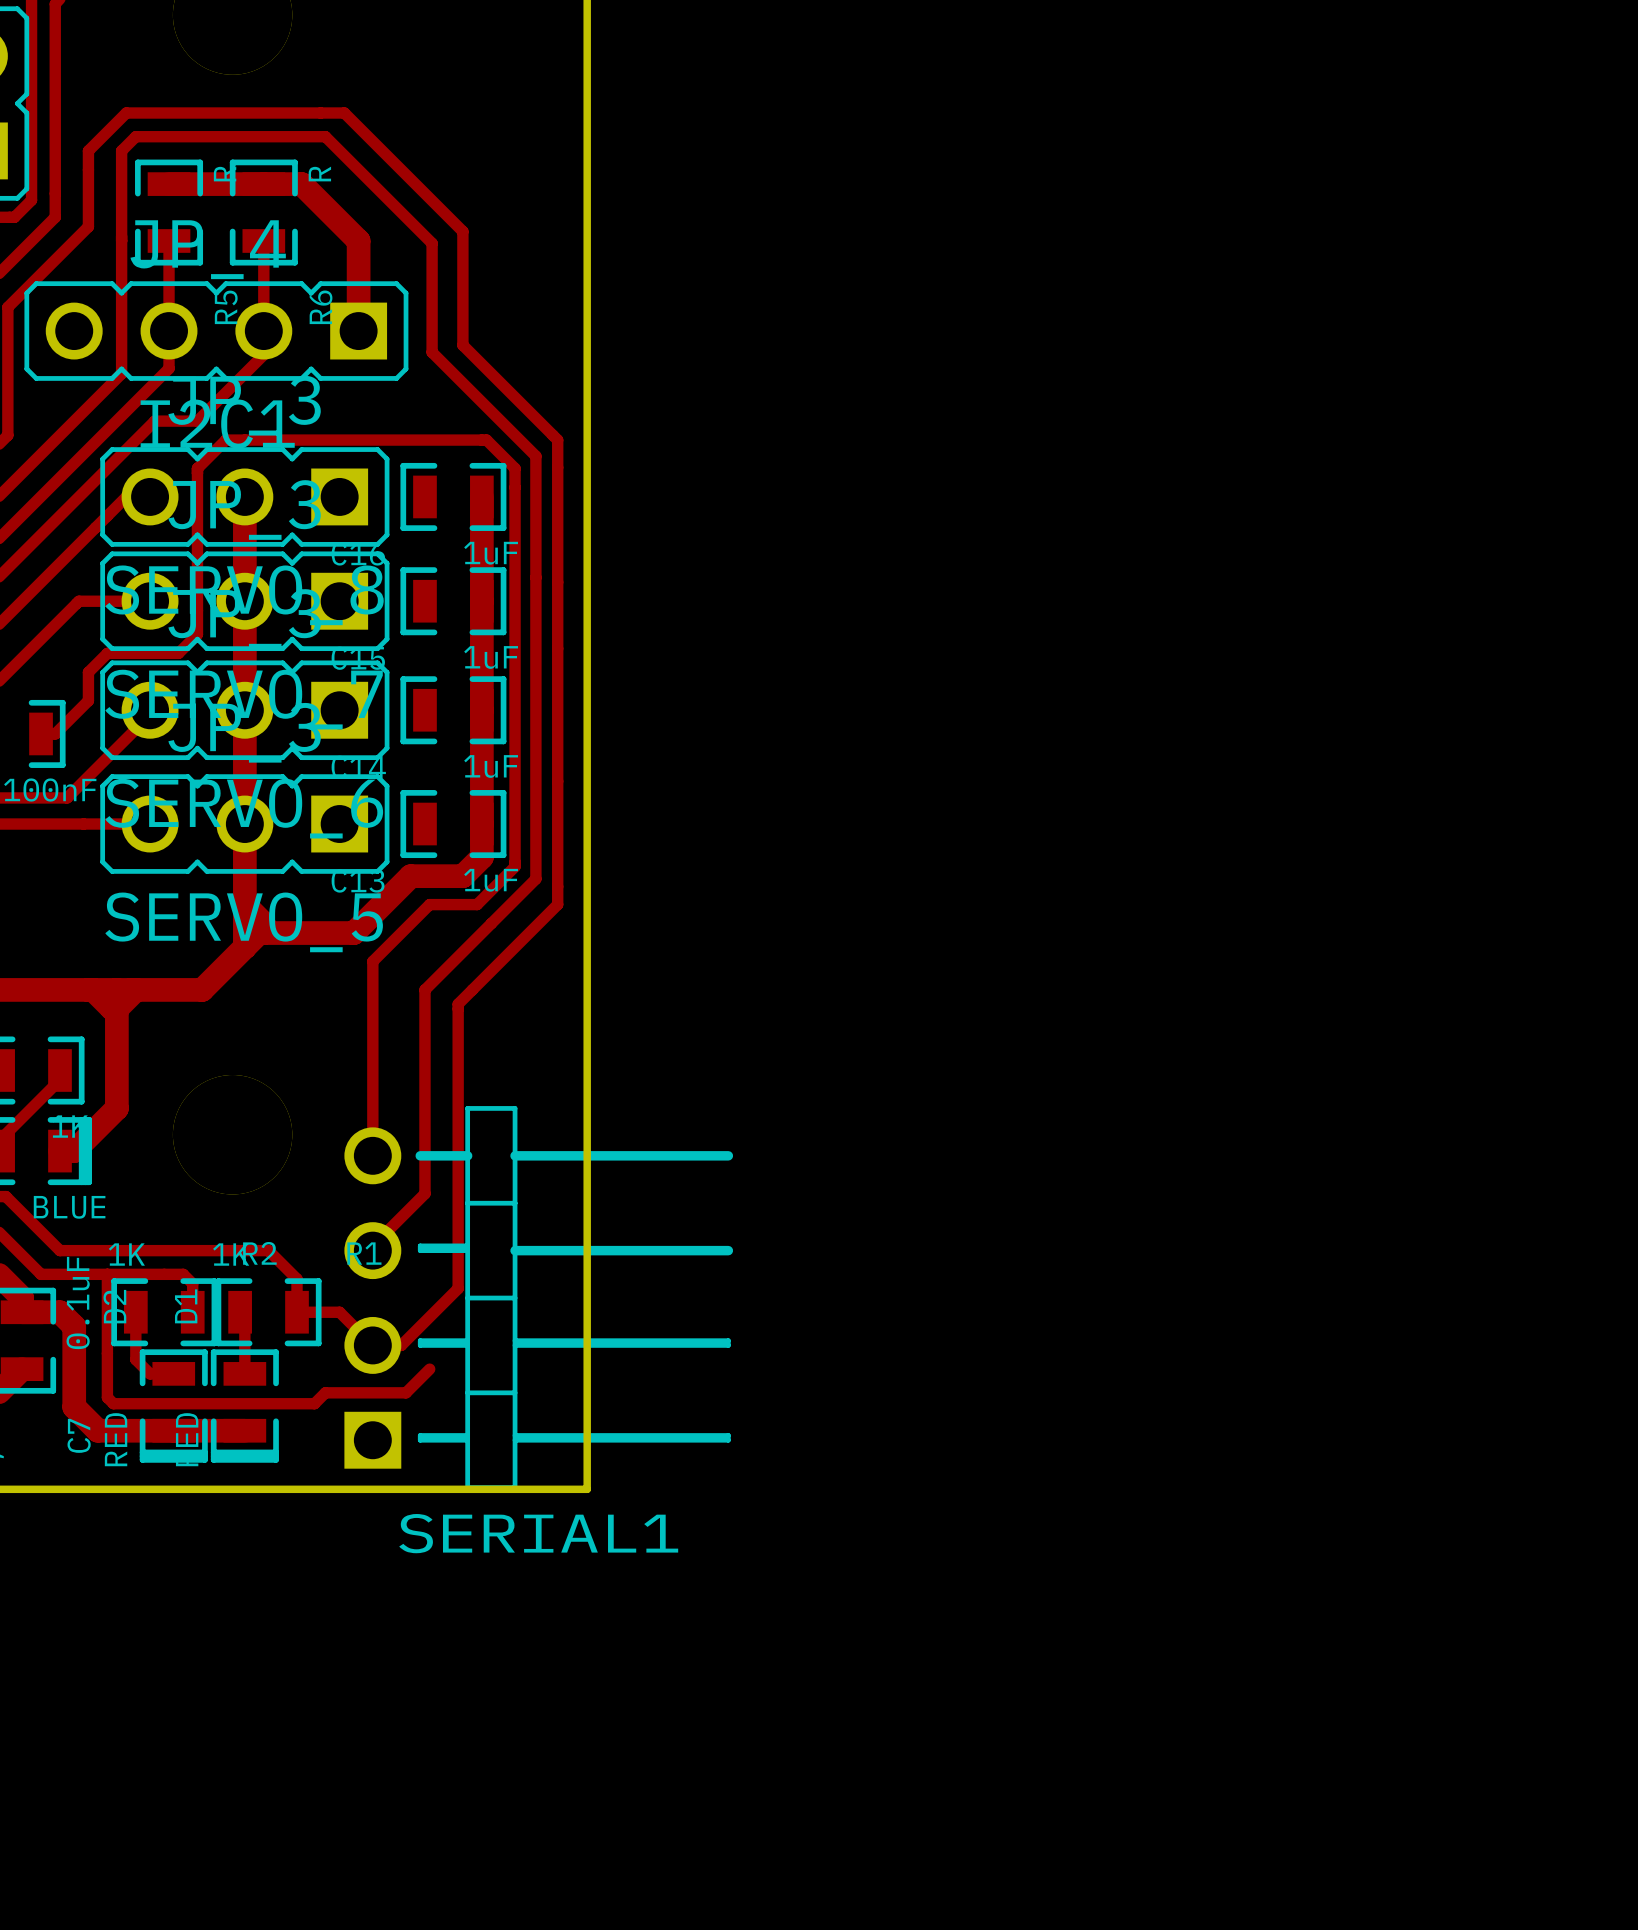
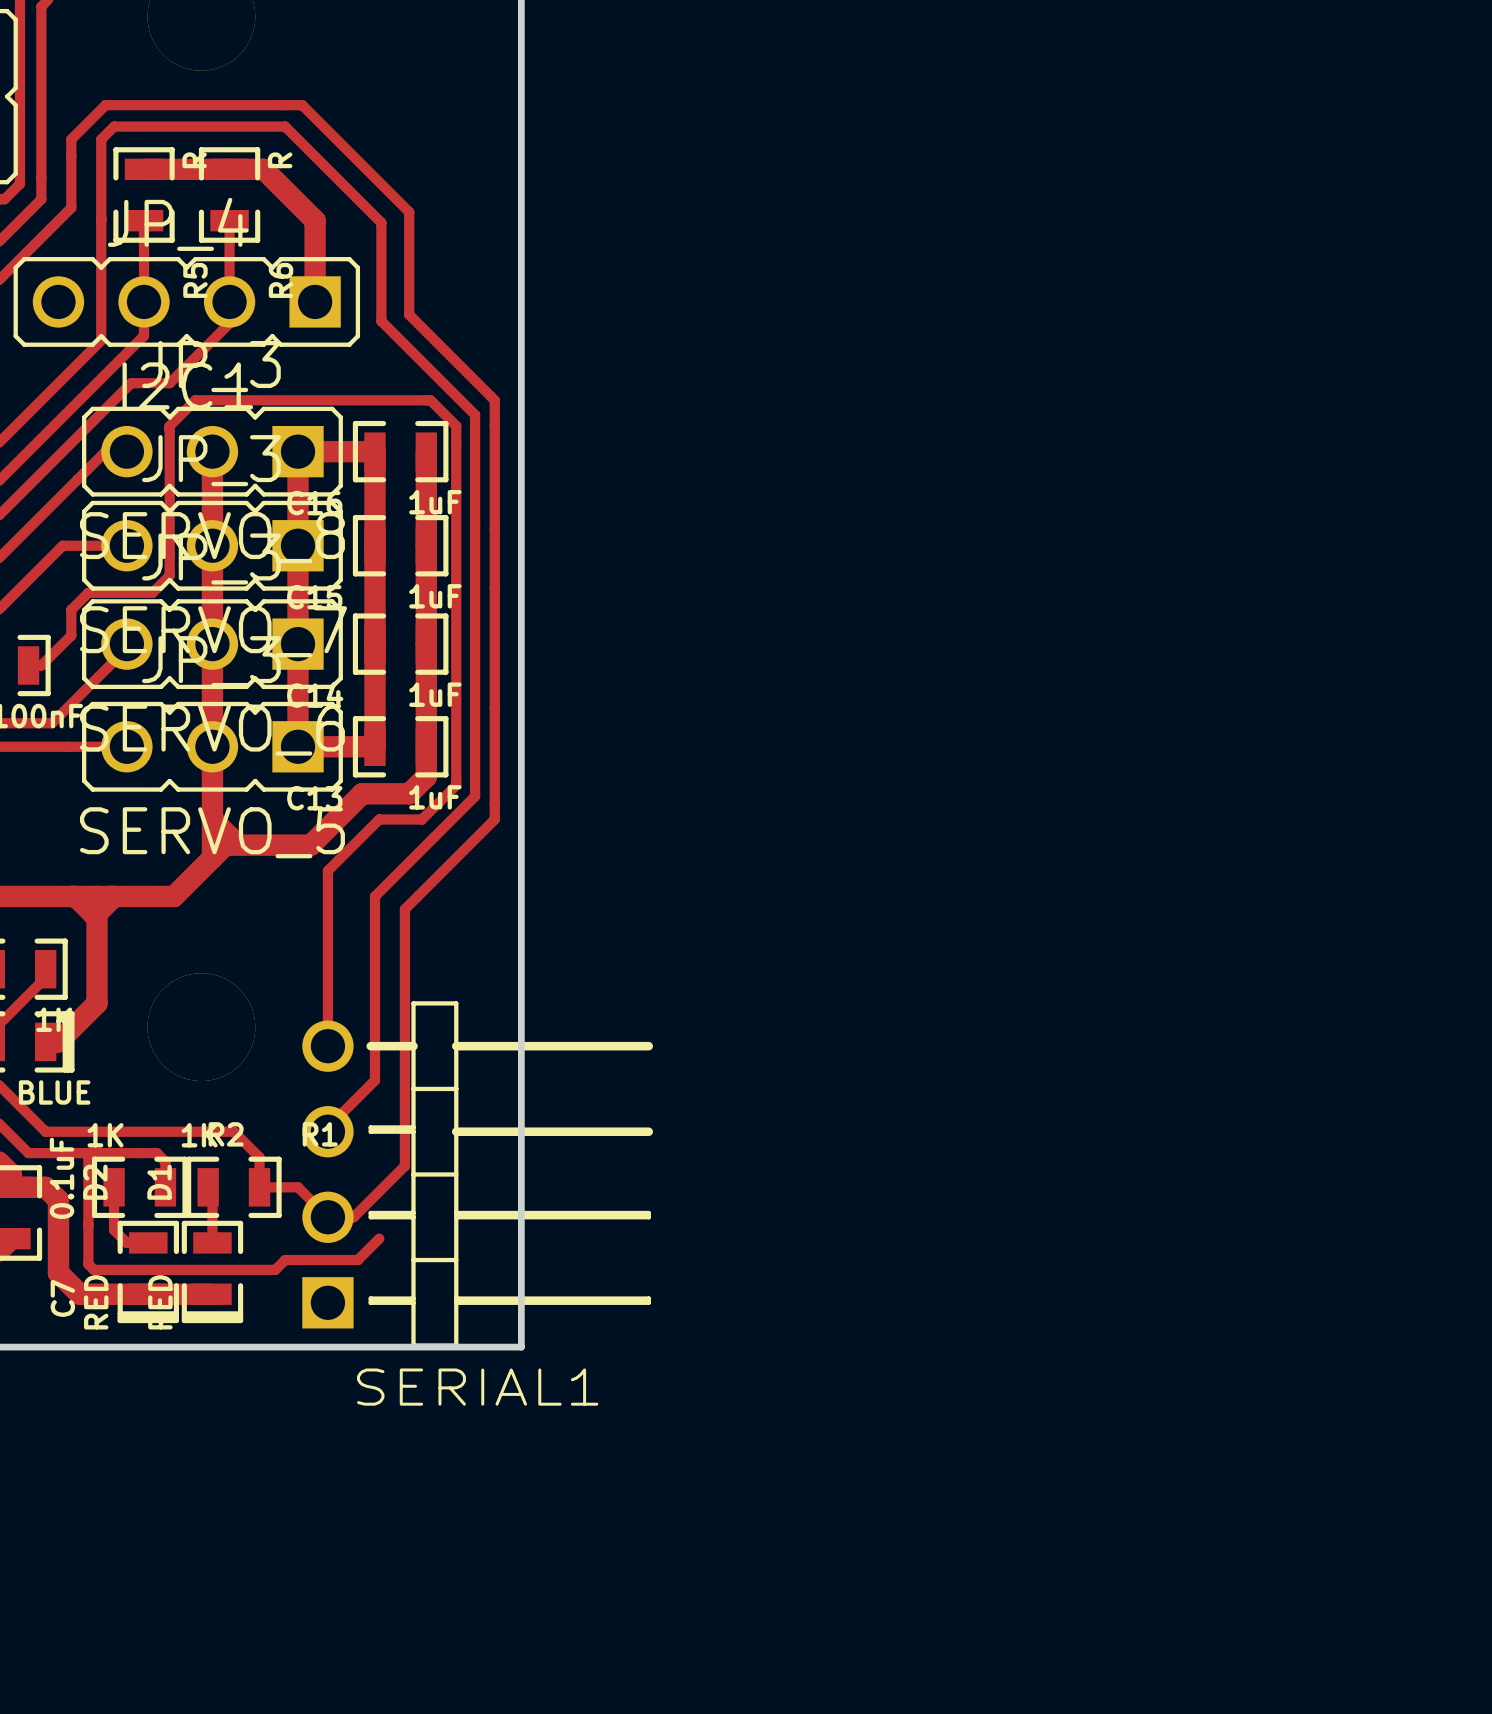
track: none -> (298, 451) (298, 746) (375, 746) (375, 451) (298, 451)

